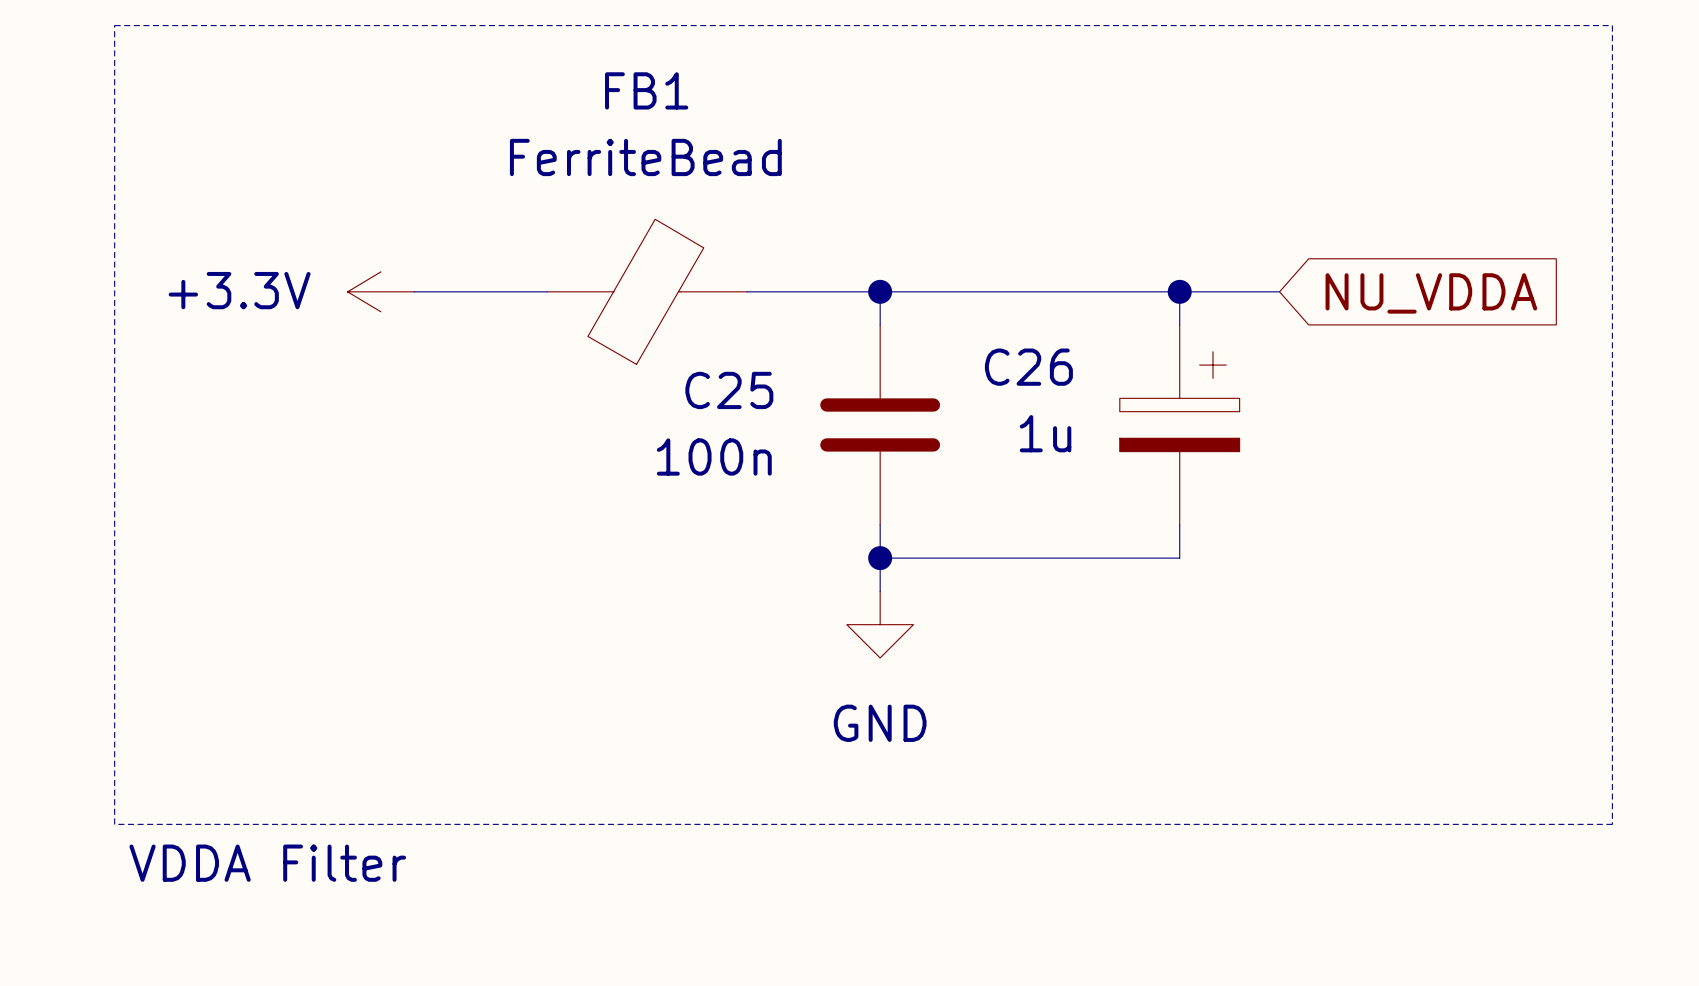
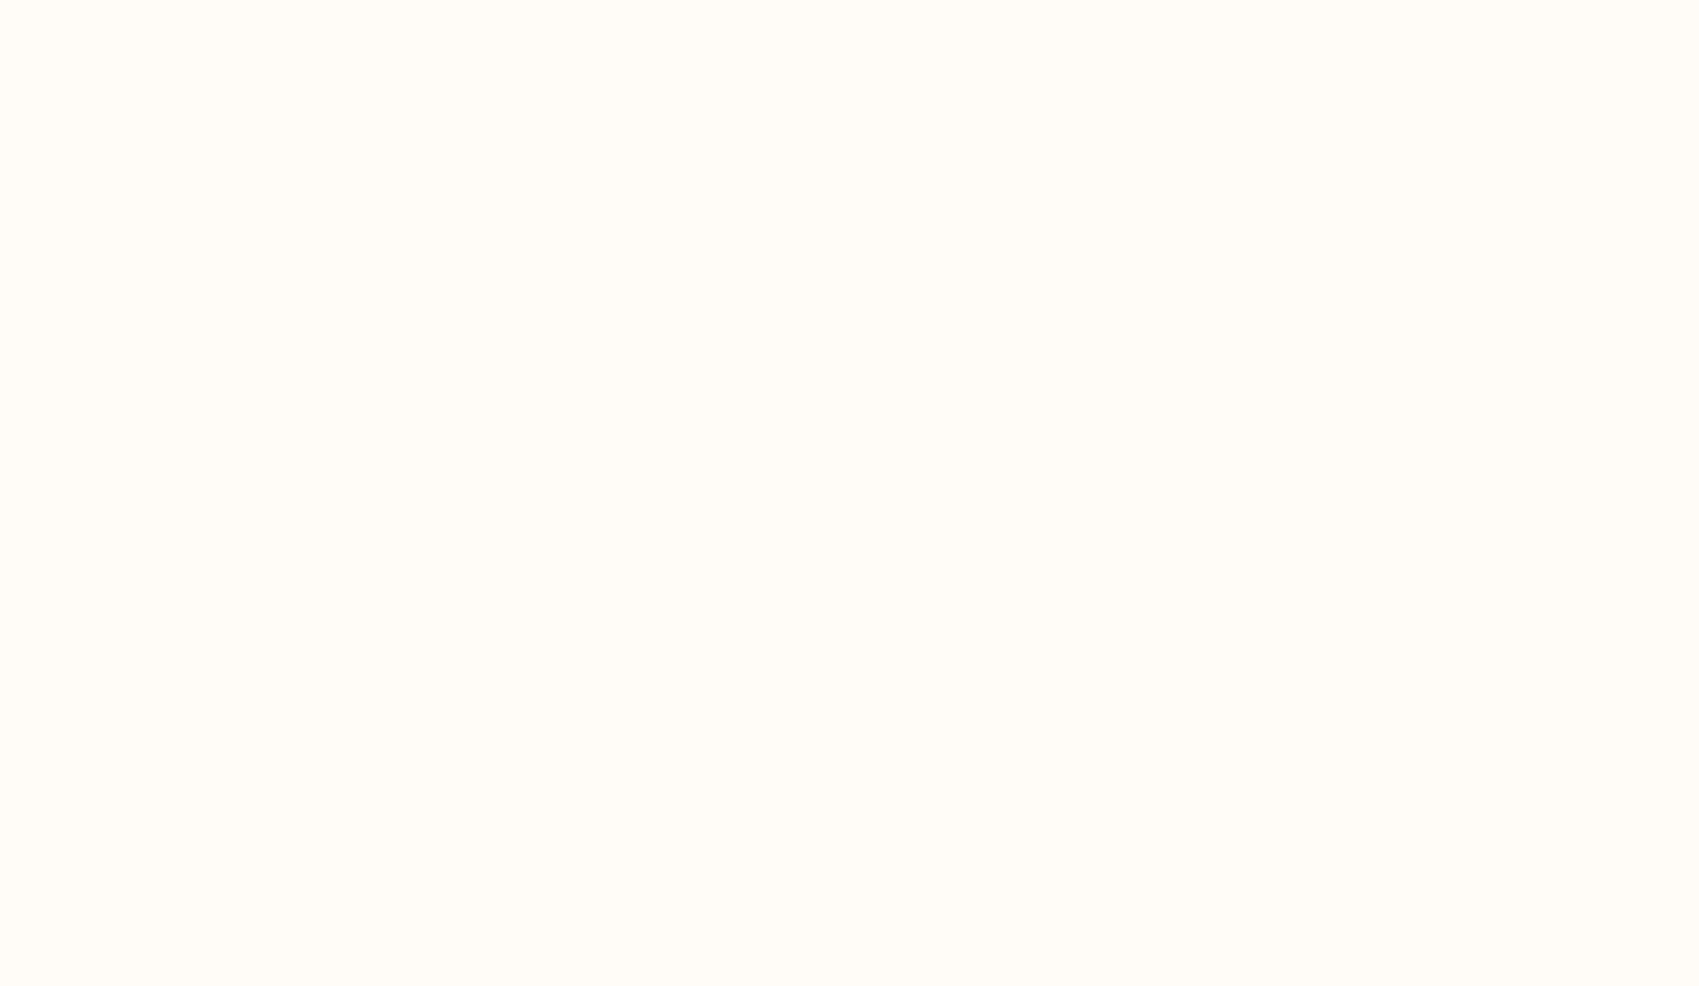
line: (114, 25) (1612, 25) (1612, 824) (114, 824) (114, 25) -> none
power symbol: +3.3V (380, 291) -> none
wire: (414, 291) (547, 291) -> none
FB1: FerriteBead (647, 291) -> none
wire: (747, 291) (1279, 291) -> none
wire: (880, 291) (880, 325) -> none
junction: (880, 291) -> none
wire: (1179, 291) (1179, 325) -> none
junction: (1179, 291) -> none
global label: NU_VDDA (1431, 293) -> none
C25: 100n (880, 424) -> none
C26: 1u (1179, 424) -> none
wire: (880, 524) (880, 591) -> none
wire: (1179, 524) (1179, 558) (880, 558) -> none
junction: (880, 558) -> none
power symbol: GND (880, 624) -> none
text: VDDA Filter (267, 863) -> none

